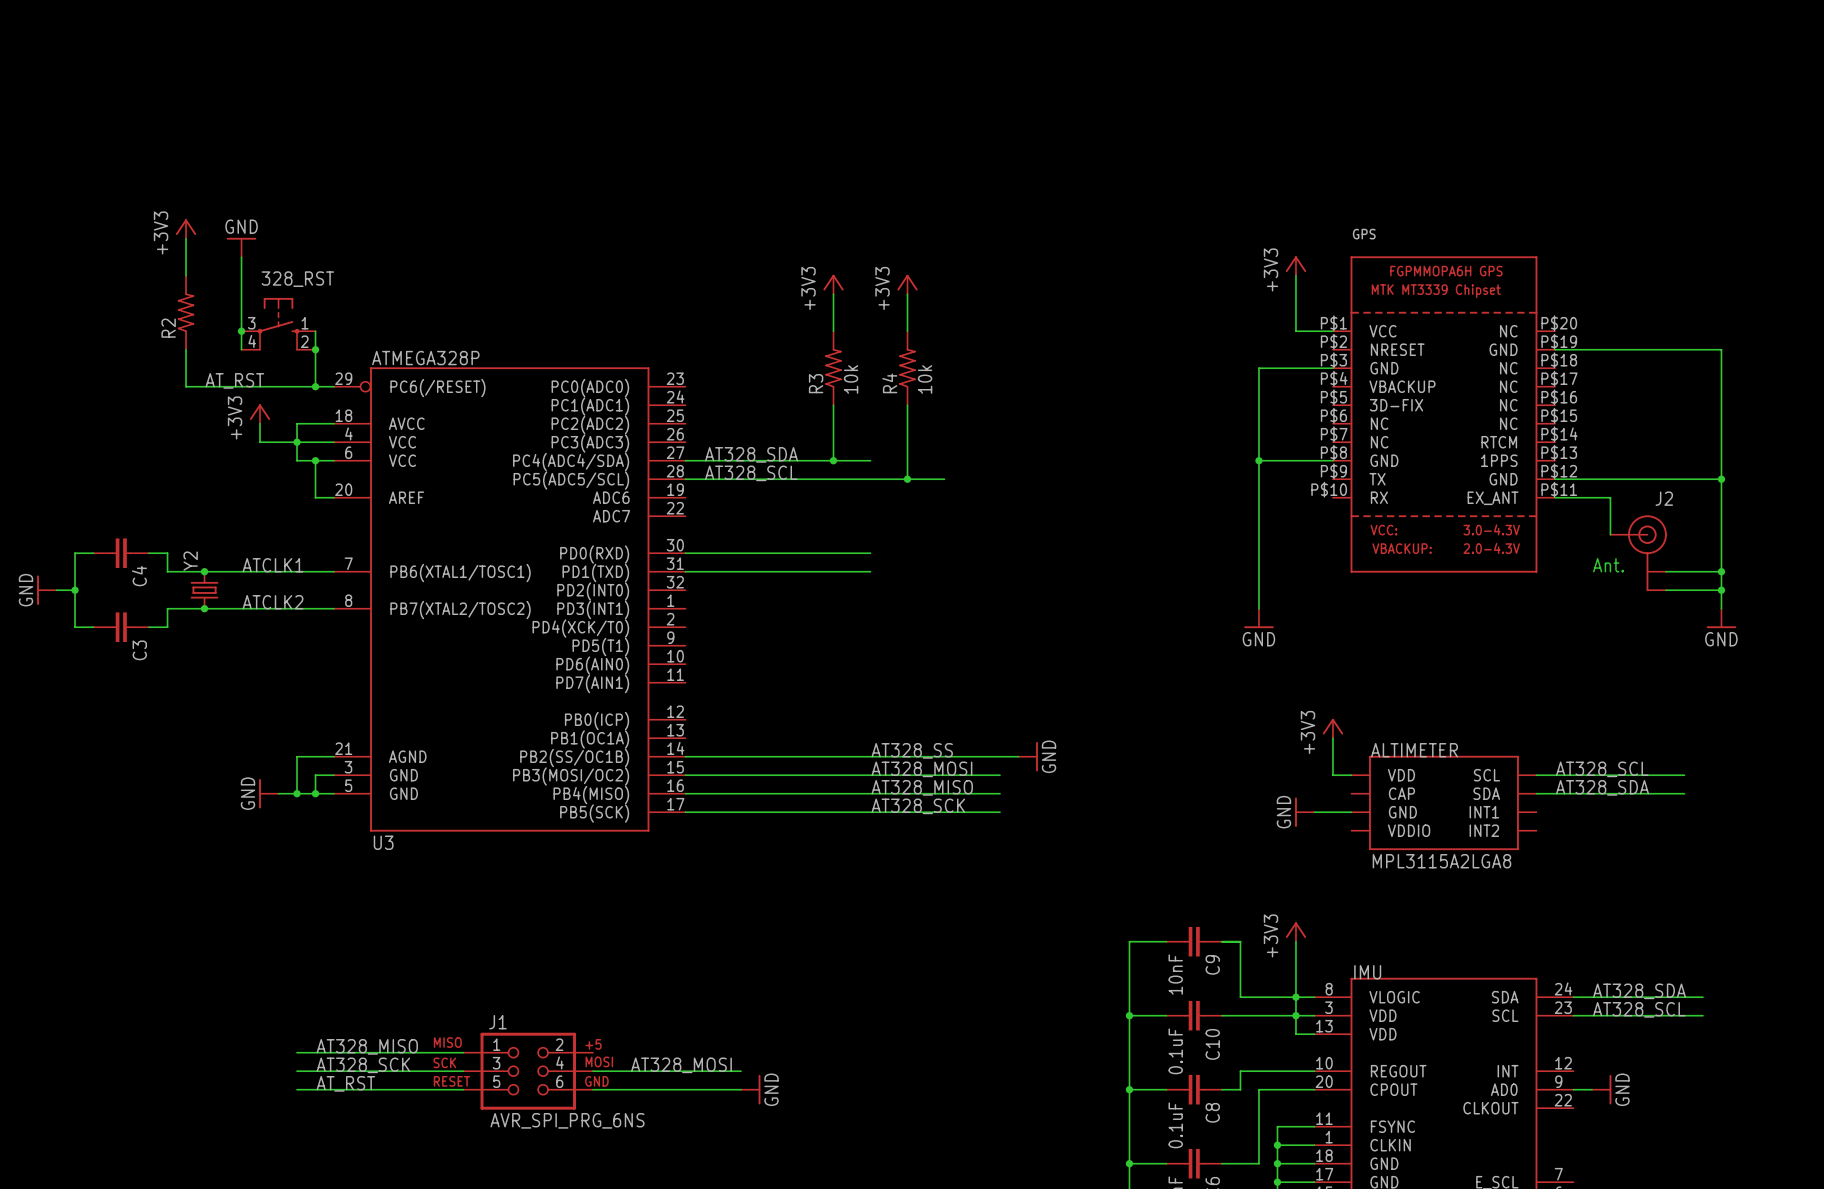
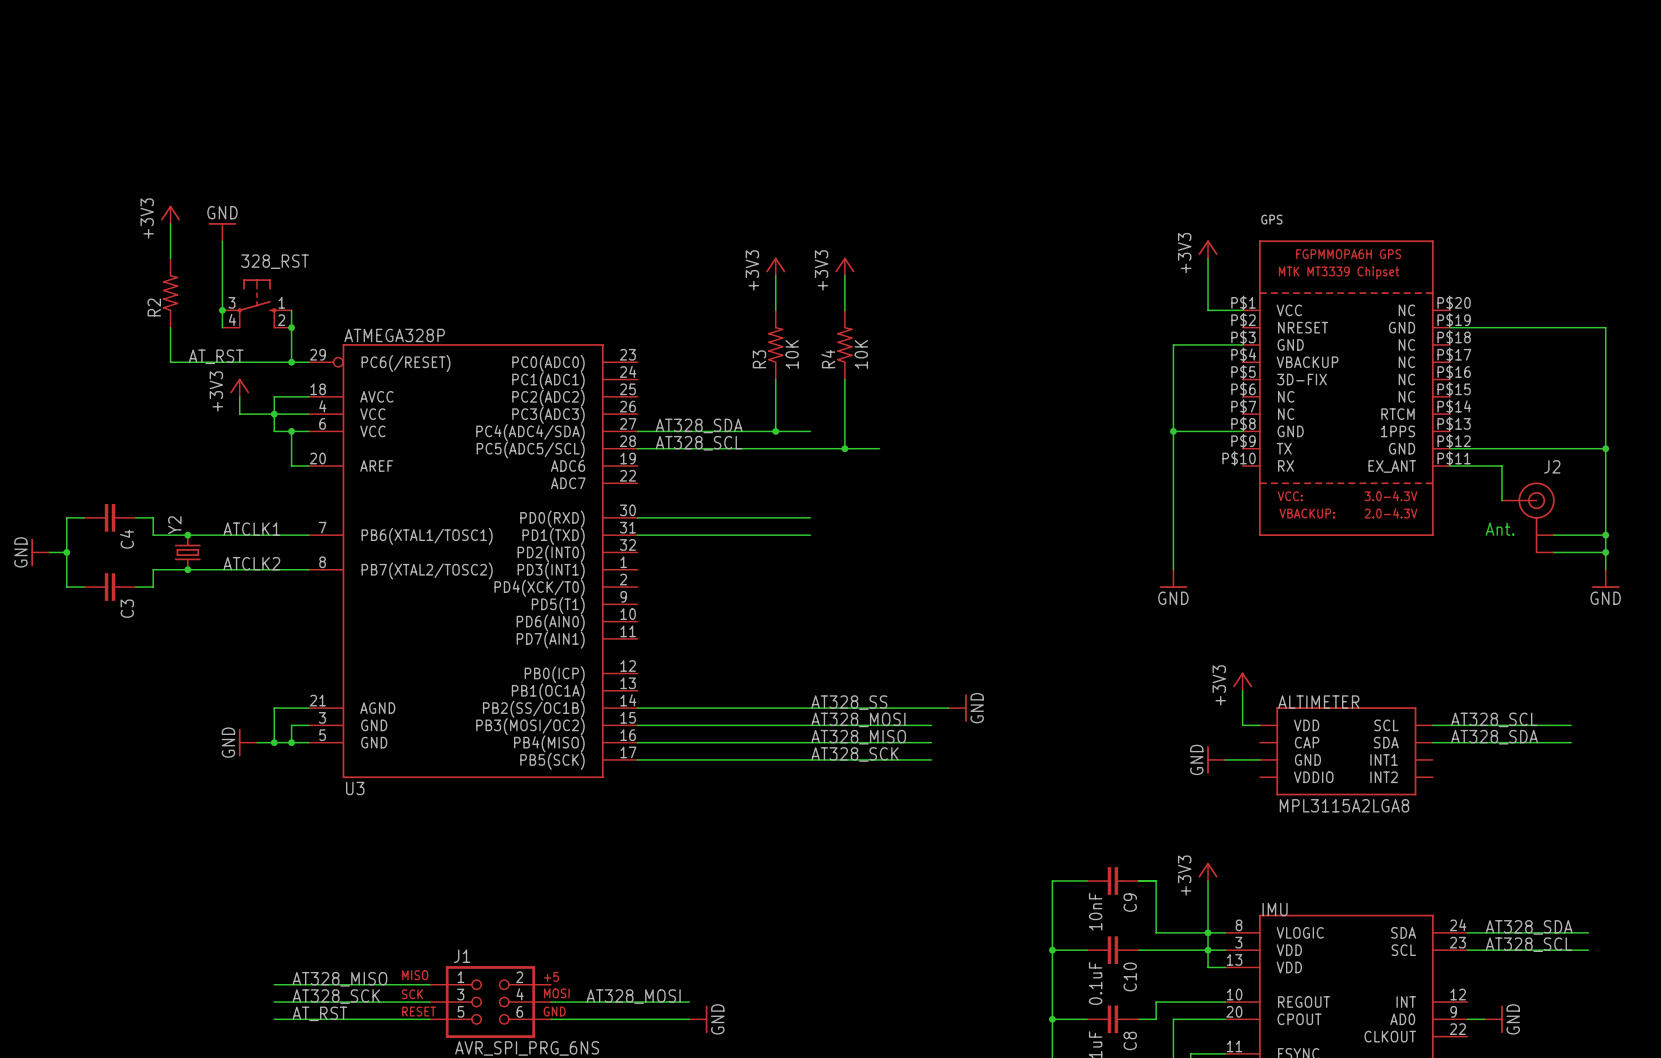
R3 value: 10k (851, 379) -> 10K (792, 354)
R4 value: 10k (925, 379) -> 10K (861, 354)

